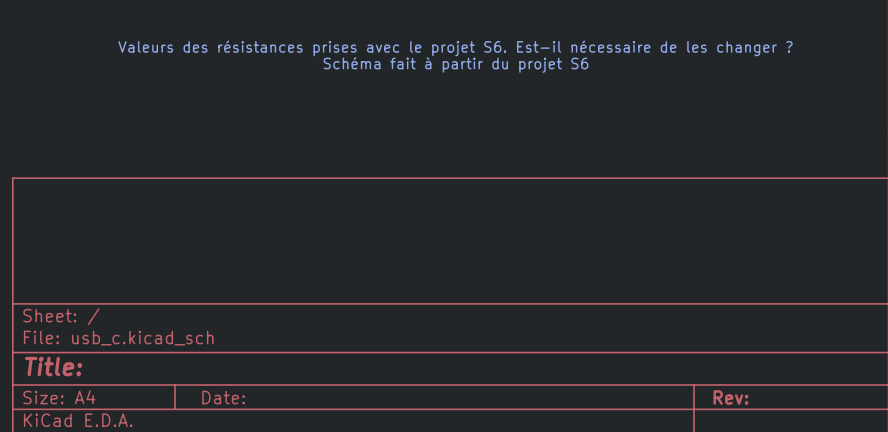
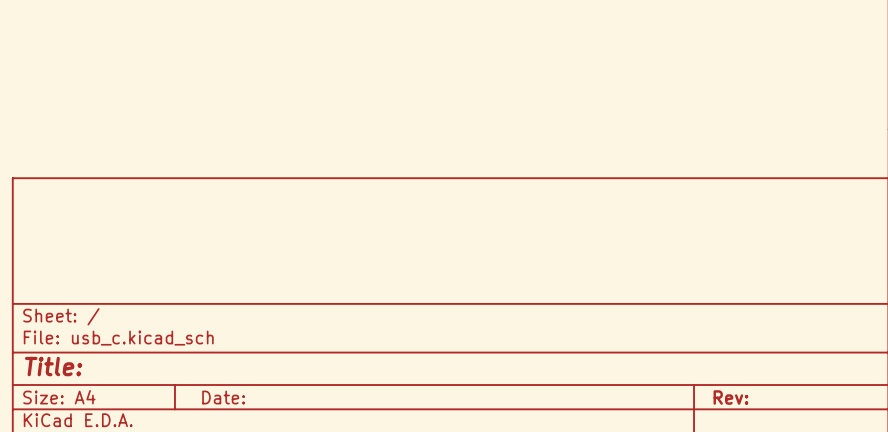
text: Valeurs des résistances prises avec le projet S6. Est-il nécessaire de les changer ? (455, 48) -> none
text: Schéma fait à partir du projet S6 (455, 64) -> none

